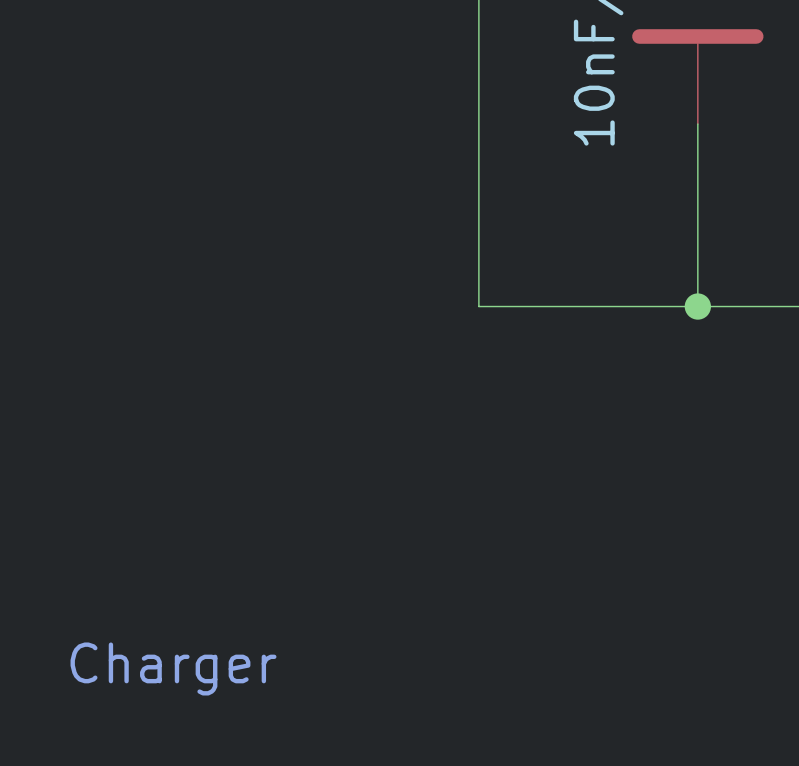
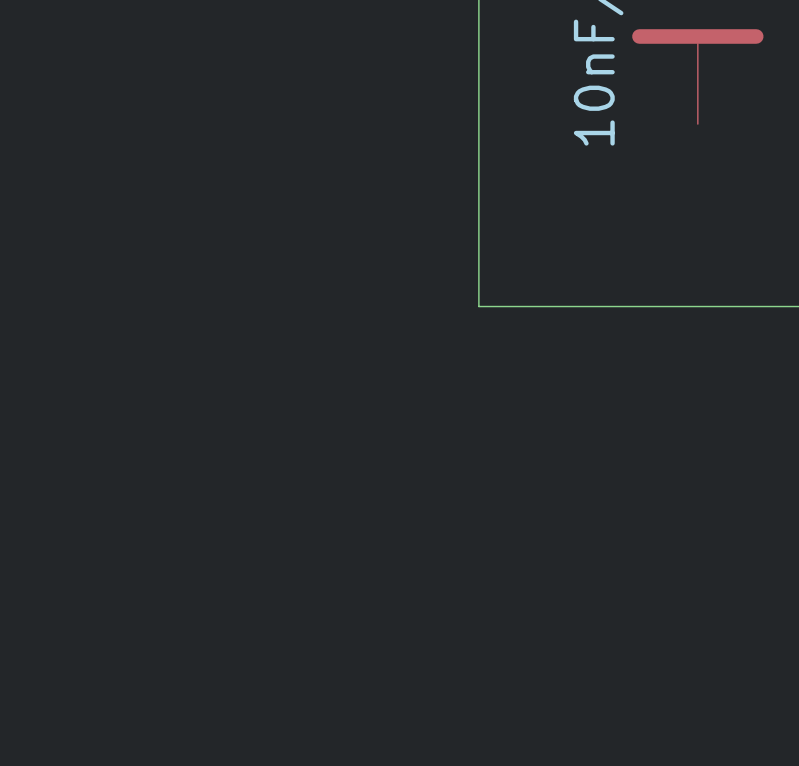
wire: (697, 124) (697, 306) -> none
junction: (697, 306) -> none
text: Charger (173, 668) -> none

